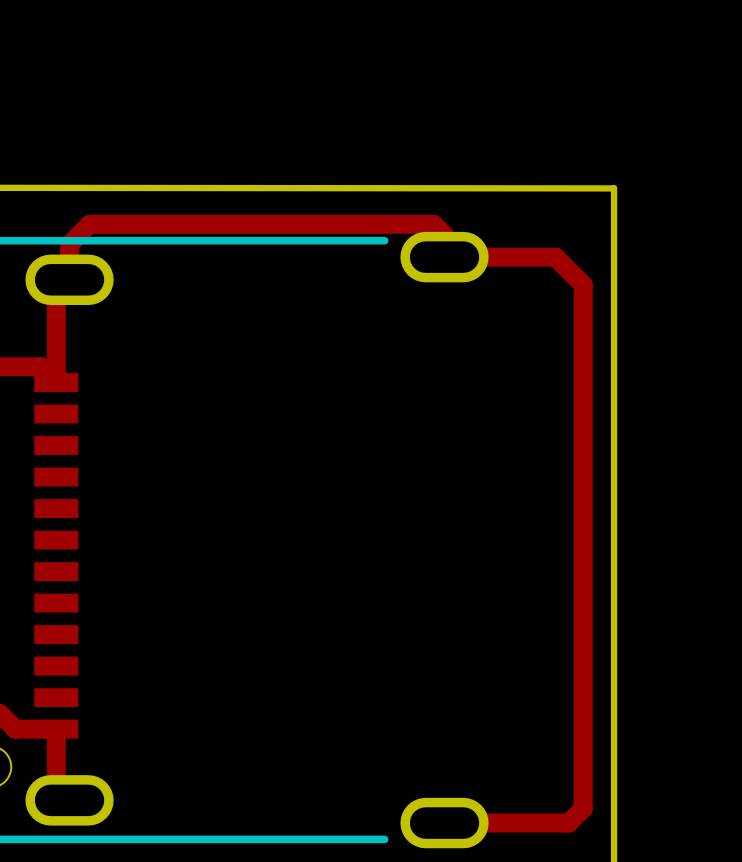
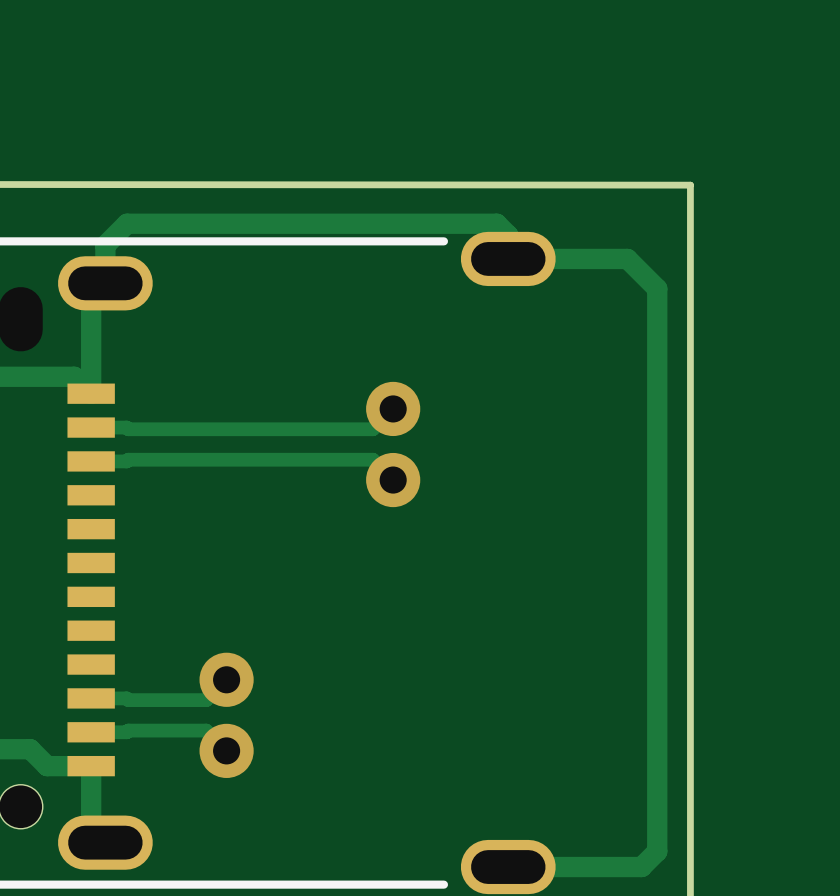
track: none -> (393, 408) (372, 429) (91, 427)
via: none -> (393, 408)
track: none -> (91, 461) (372, 459) (393, 480)
via: none -> (393, 480)
track: none -> (226, 679) (206, 700) (91, 698)
via: none -> (226, 679)
track: none -> (91, 732) (206, 730) (226, 750)
via: none -> (226, 750)

